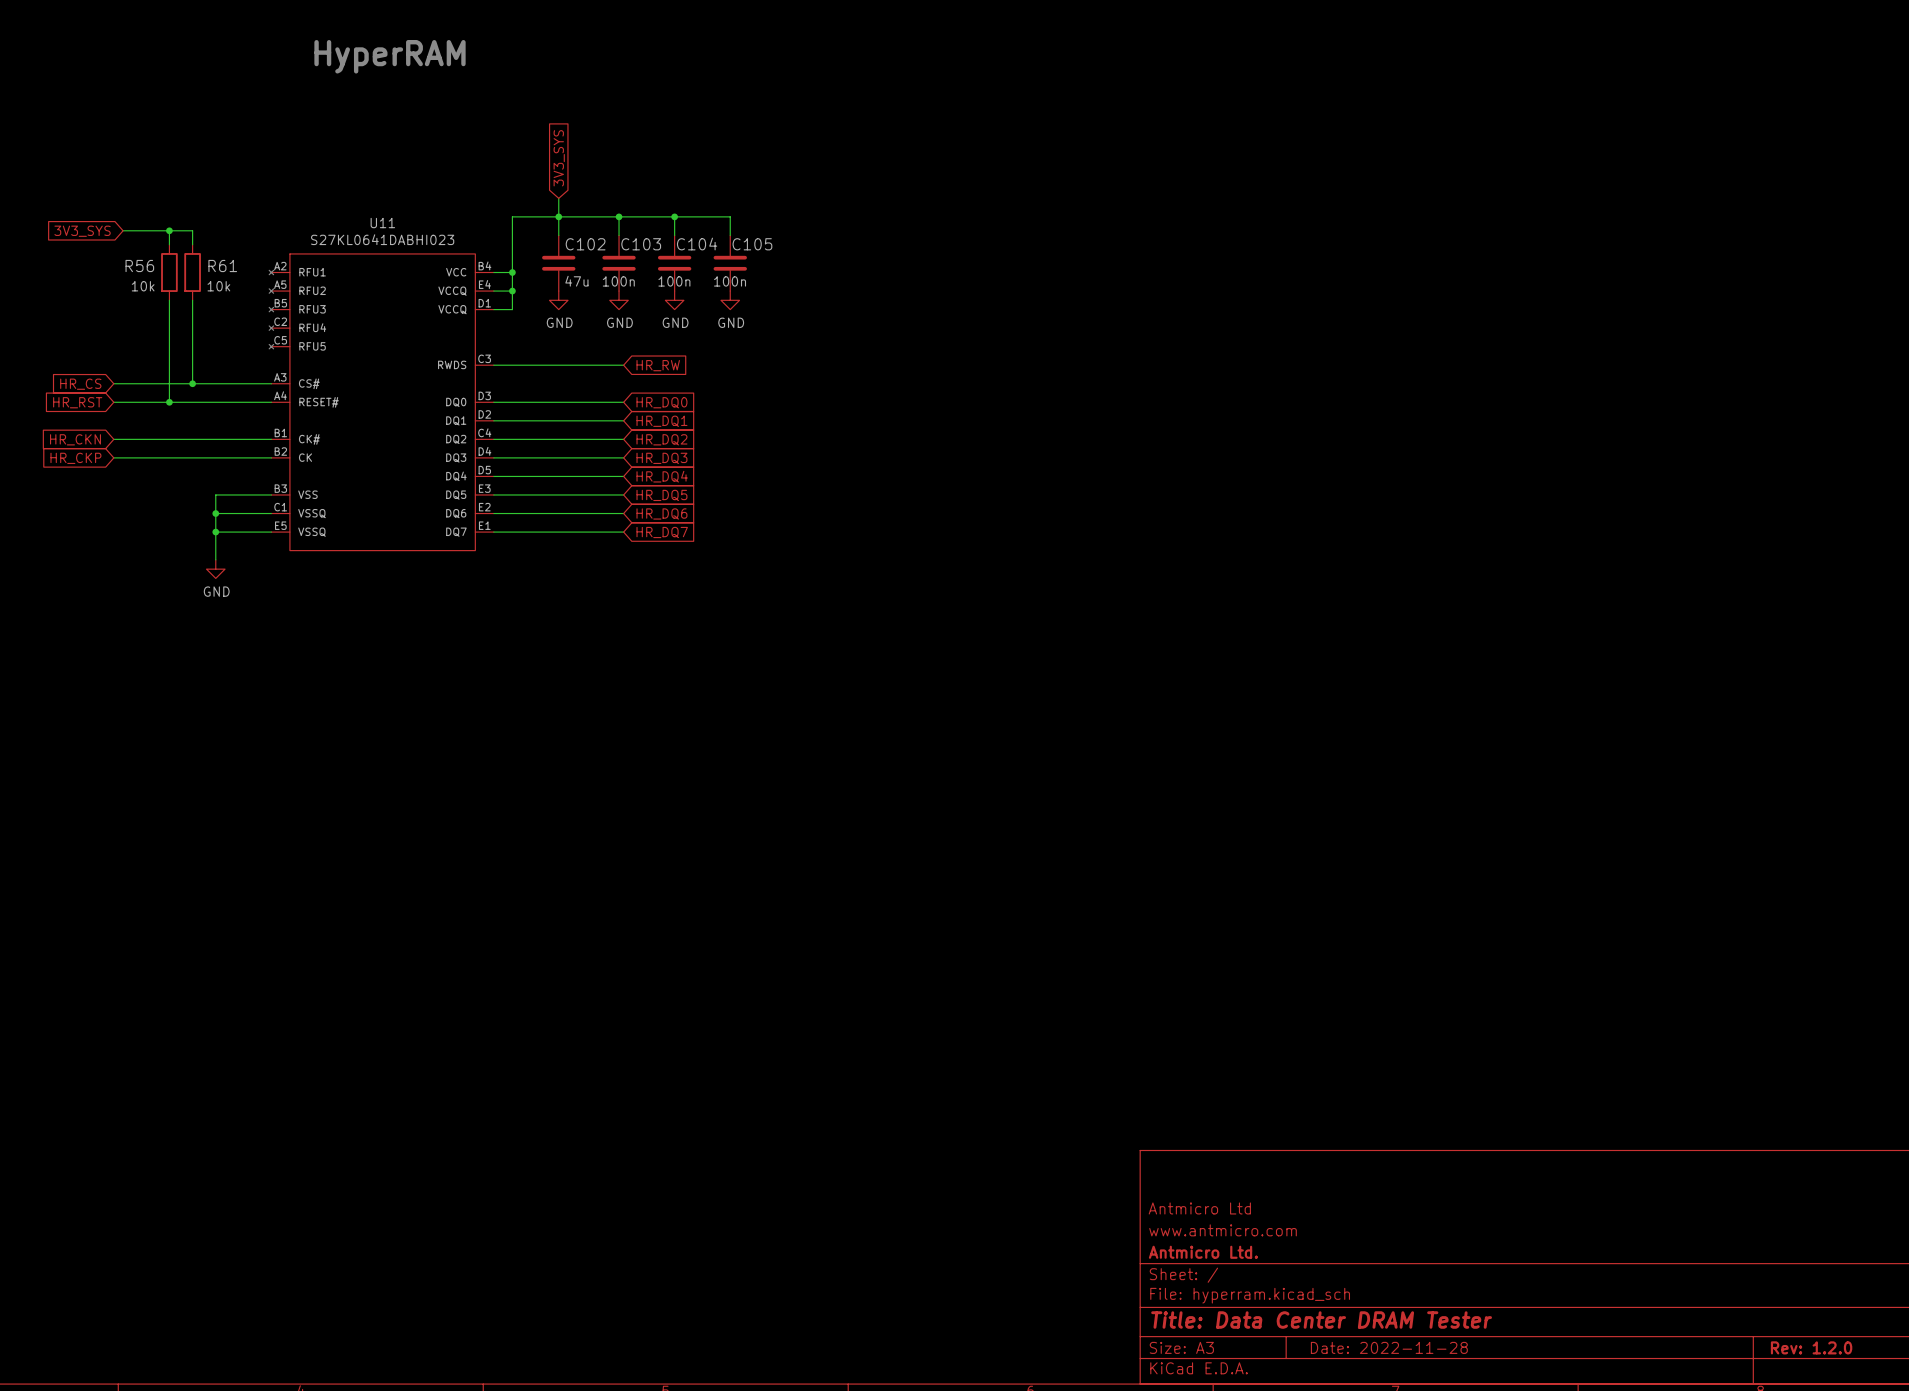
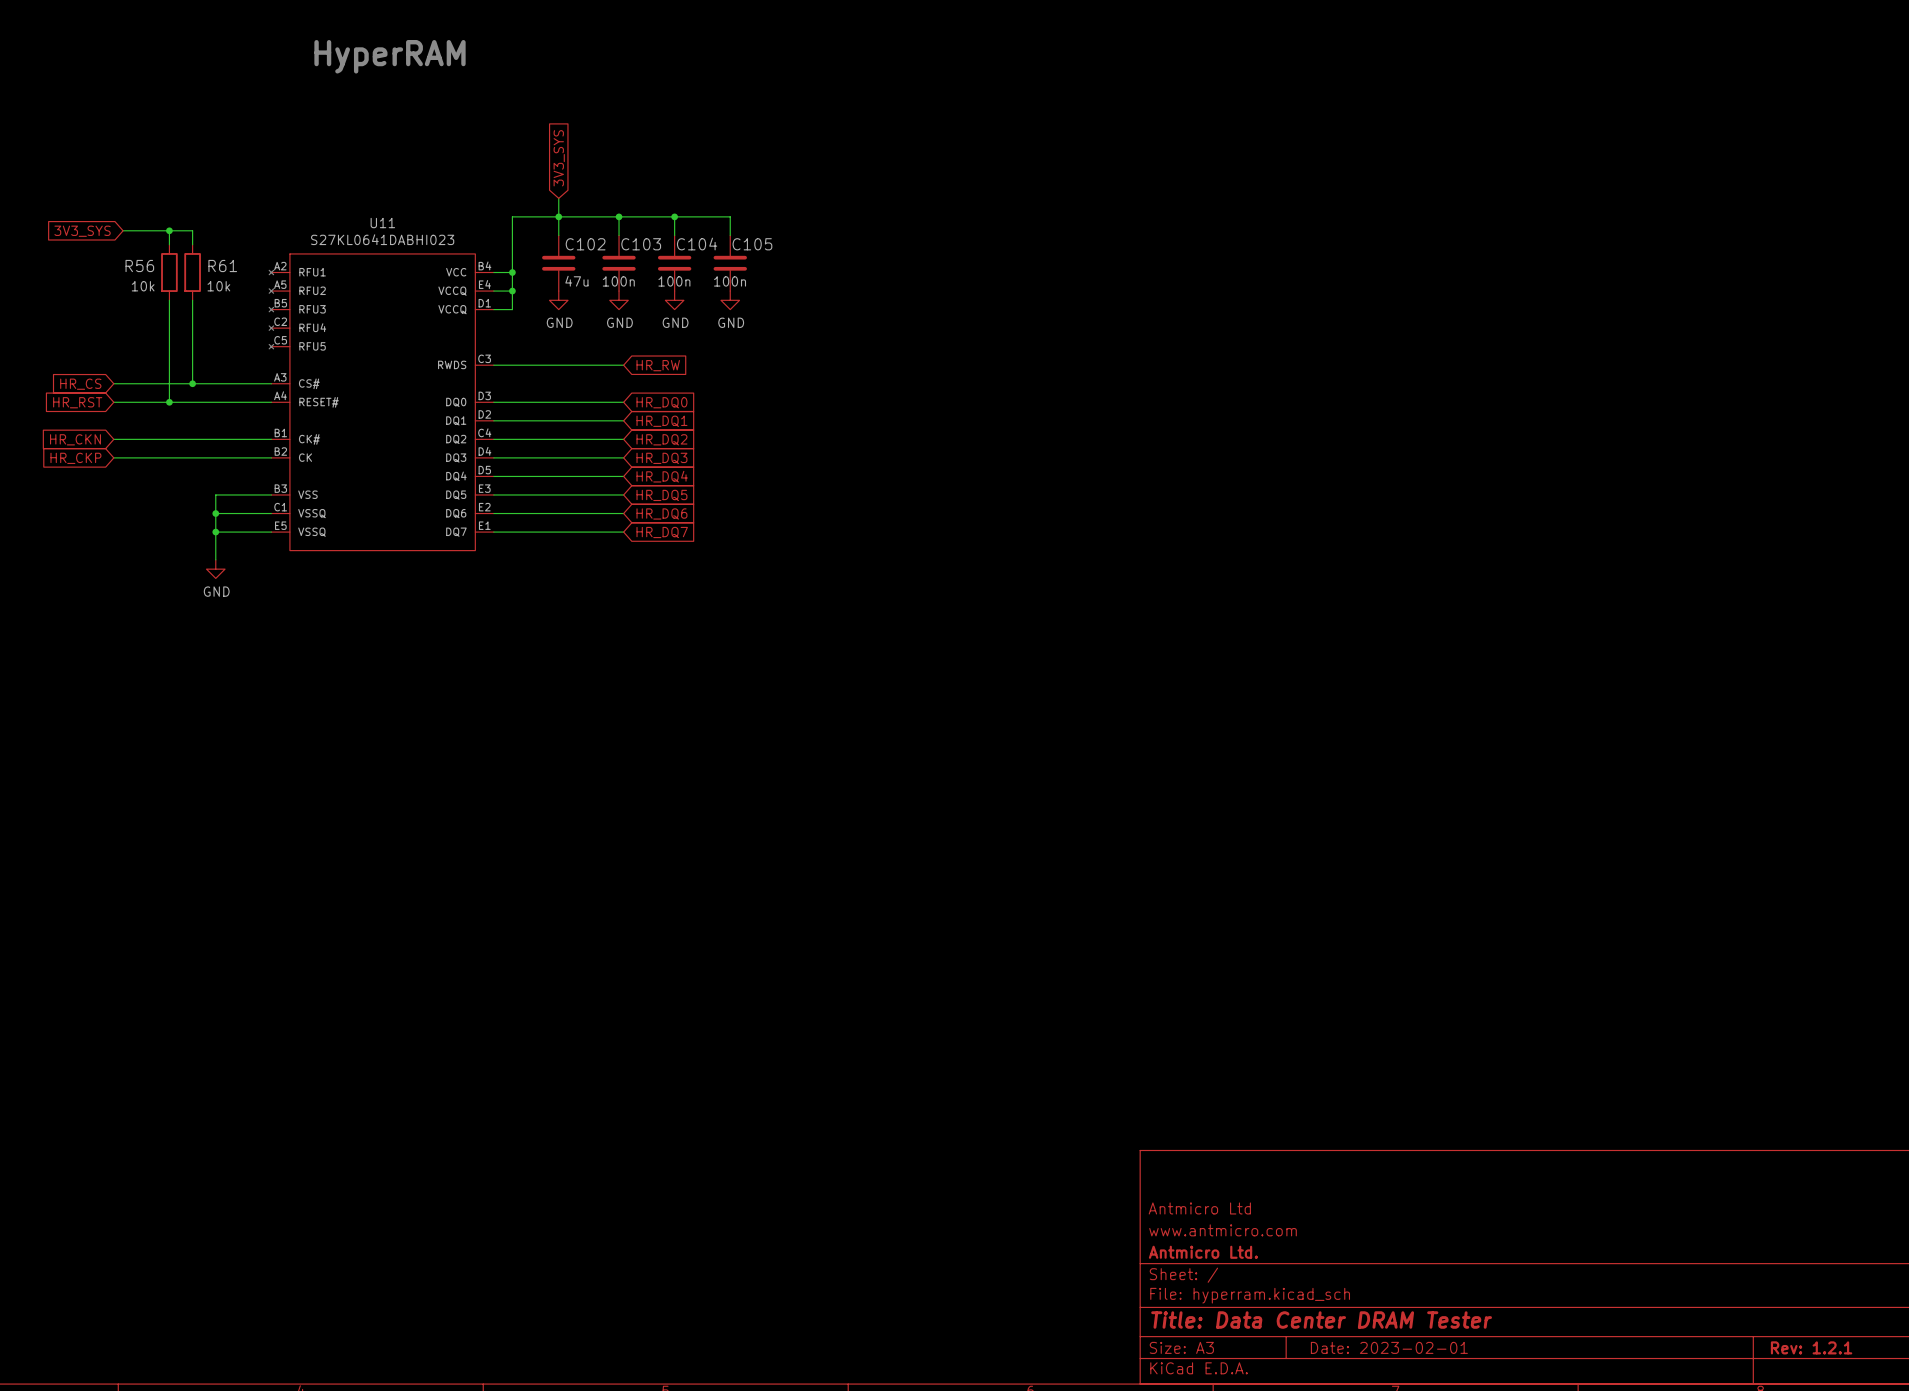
title block: Date: 2022-11-28 (1389, 1347) -> Date: 2023-02-01 (1389, 1347)
title block: Rev: 1.2.0 (1811, 1347) -> Rev: 1.2.1 (1811, 1347)

